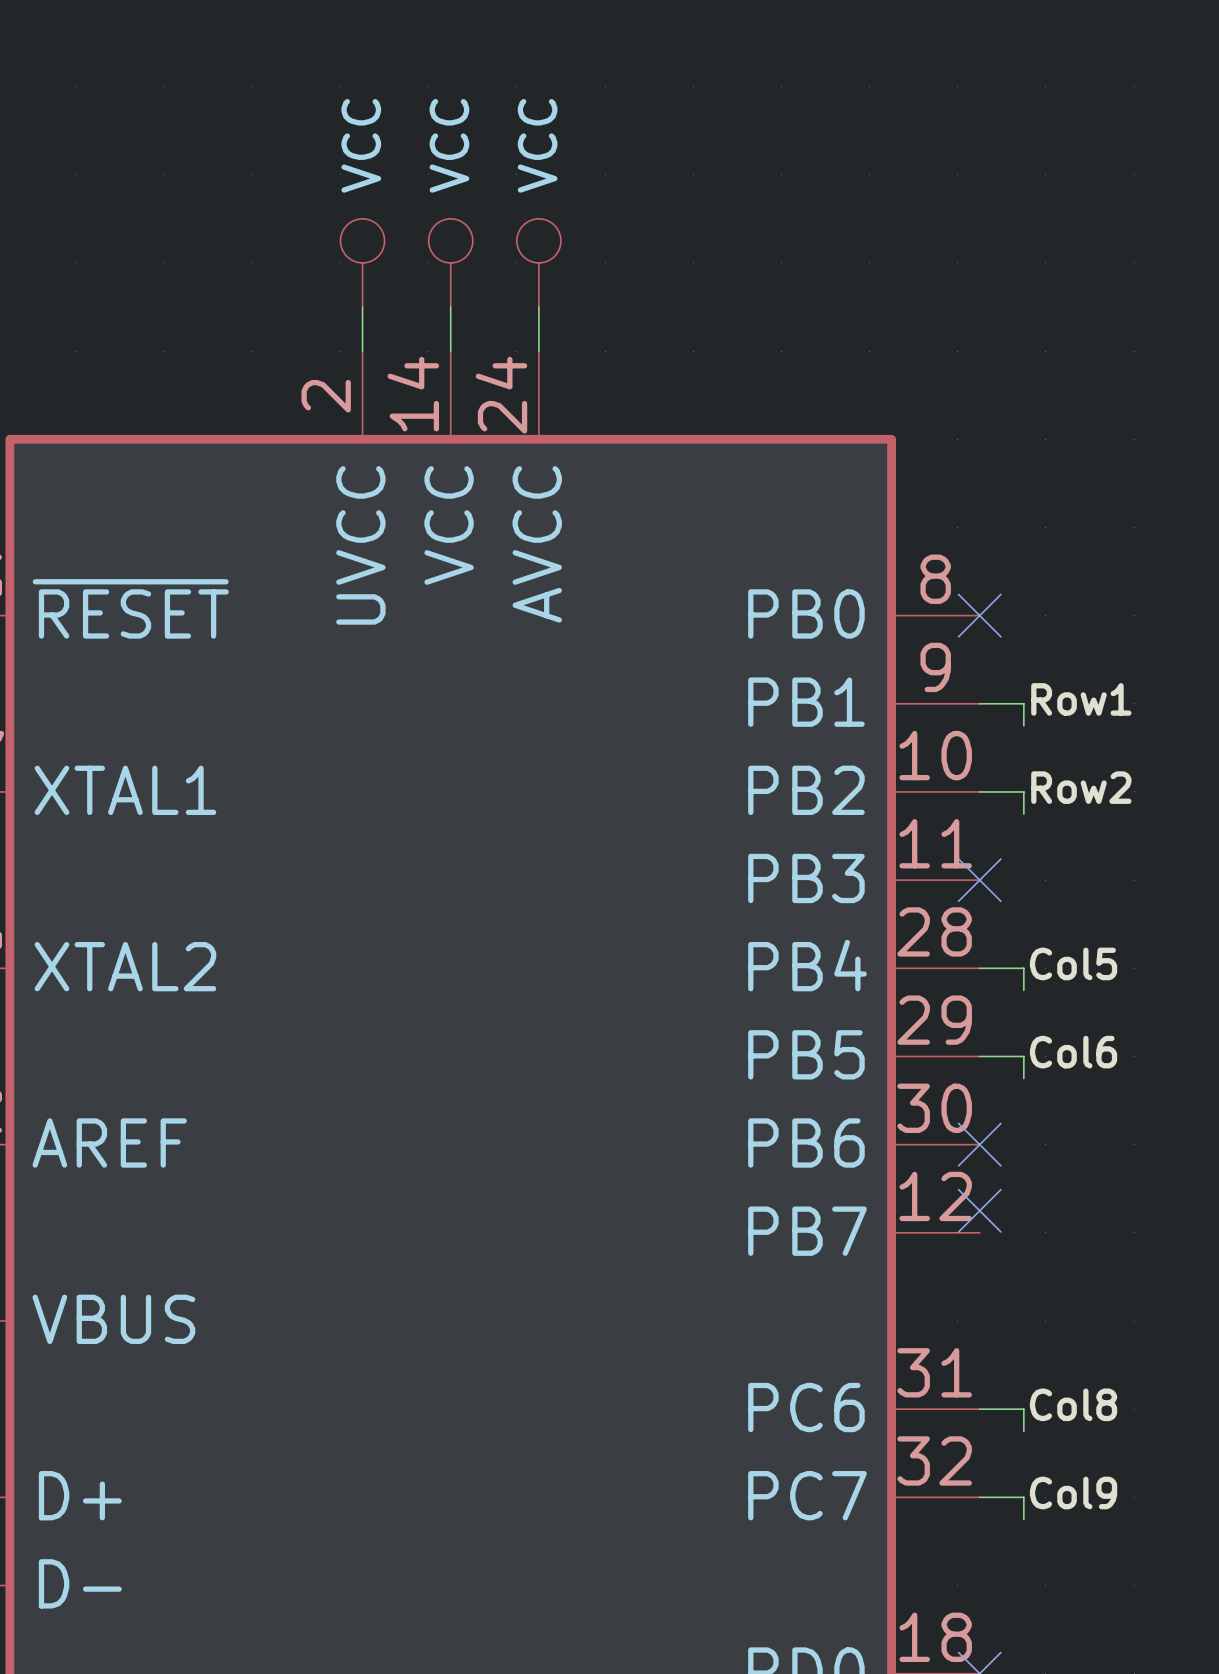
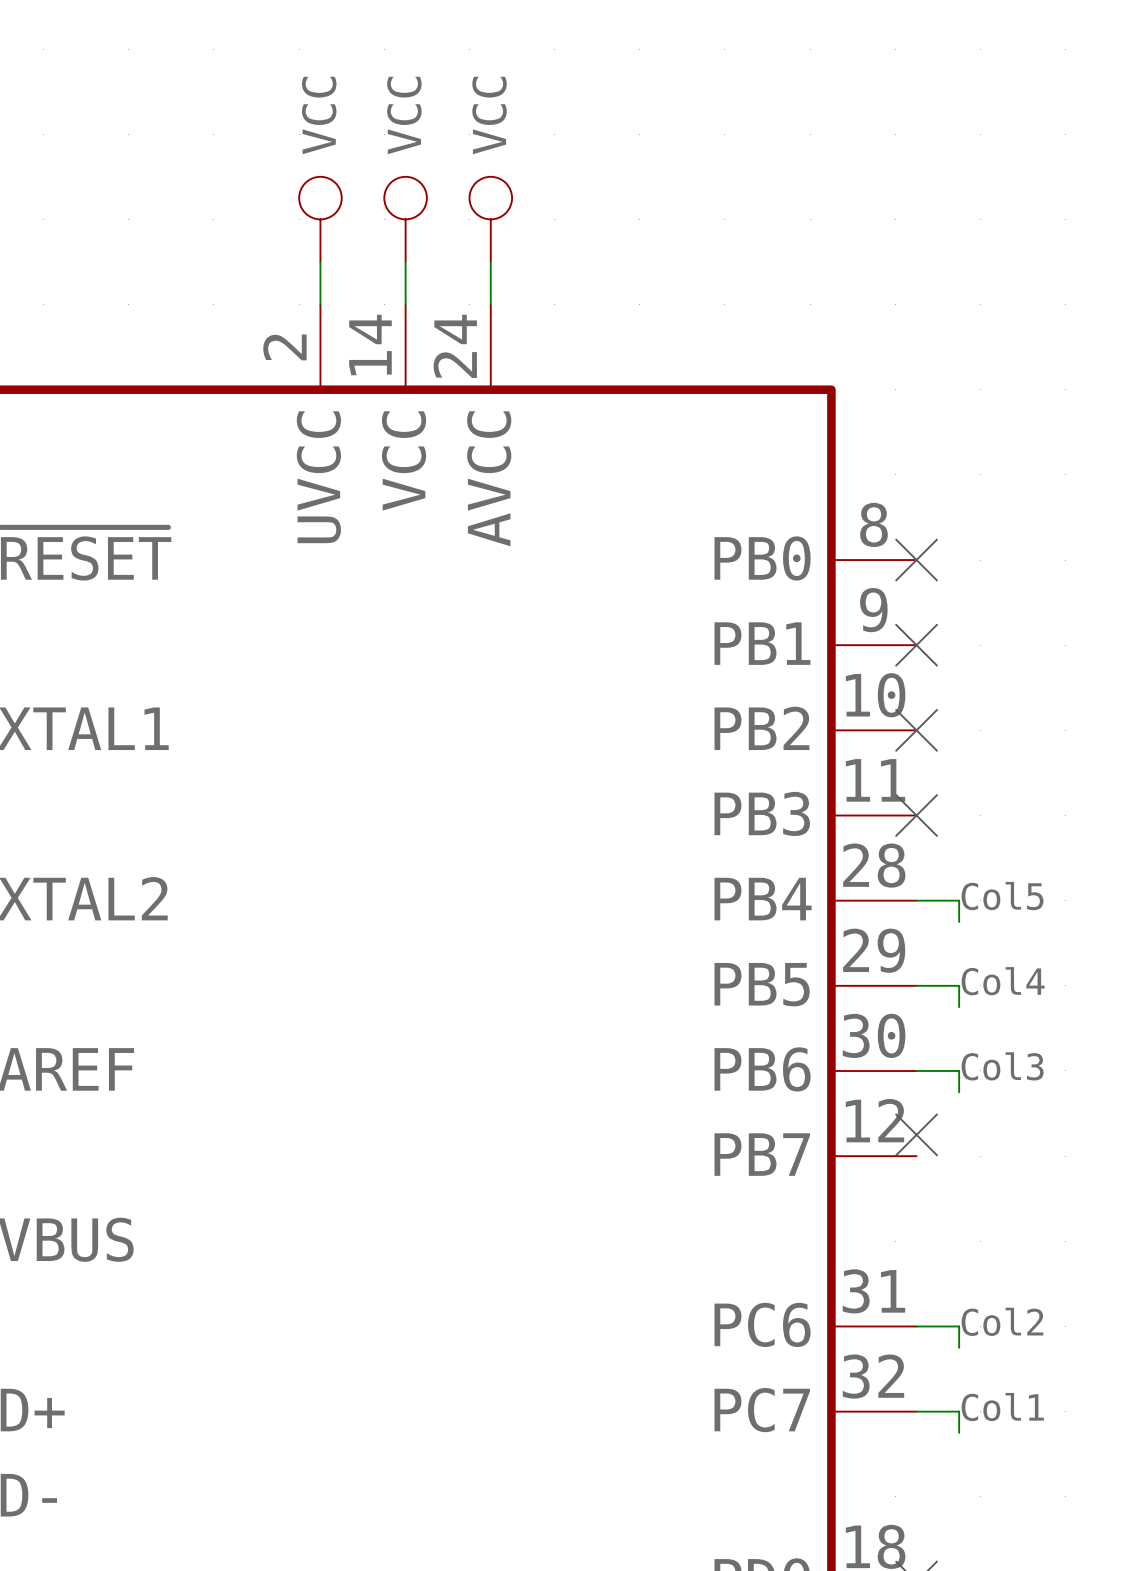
label: Row1 (1081, 699) -> none
wire: (979, 703) (1023, 703) (1023, 725) -> none
no-connect mark: none -> (916, 645)
label: Row2 (1081, 787) -> none
wire: (979, 791) (1023, 791) (1023, 814) -> (916, 1070) (959, 1070) (959, 1092)
no-connect mark: none -> (916, 730)
label: Col6 (1073, 1052) -> Col4 (1003, 981)
label: none -> Col3 (1002, 1066)
no-connect mark: (979, 1144) -> none
label: Col8 (1073, 1404) -> Col2 (1002, 1321)
label: Col9 (1073, 1492) -> Col1 (1002, 1407)

